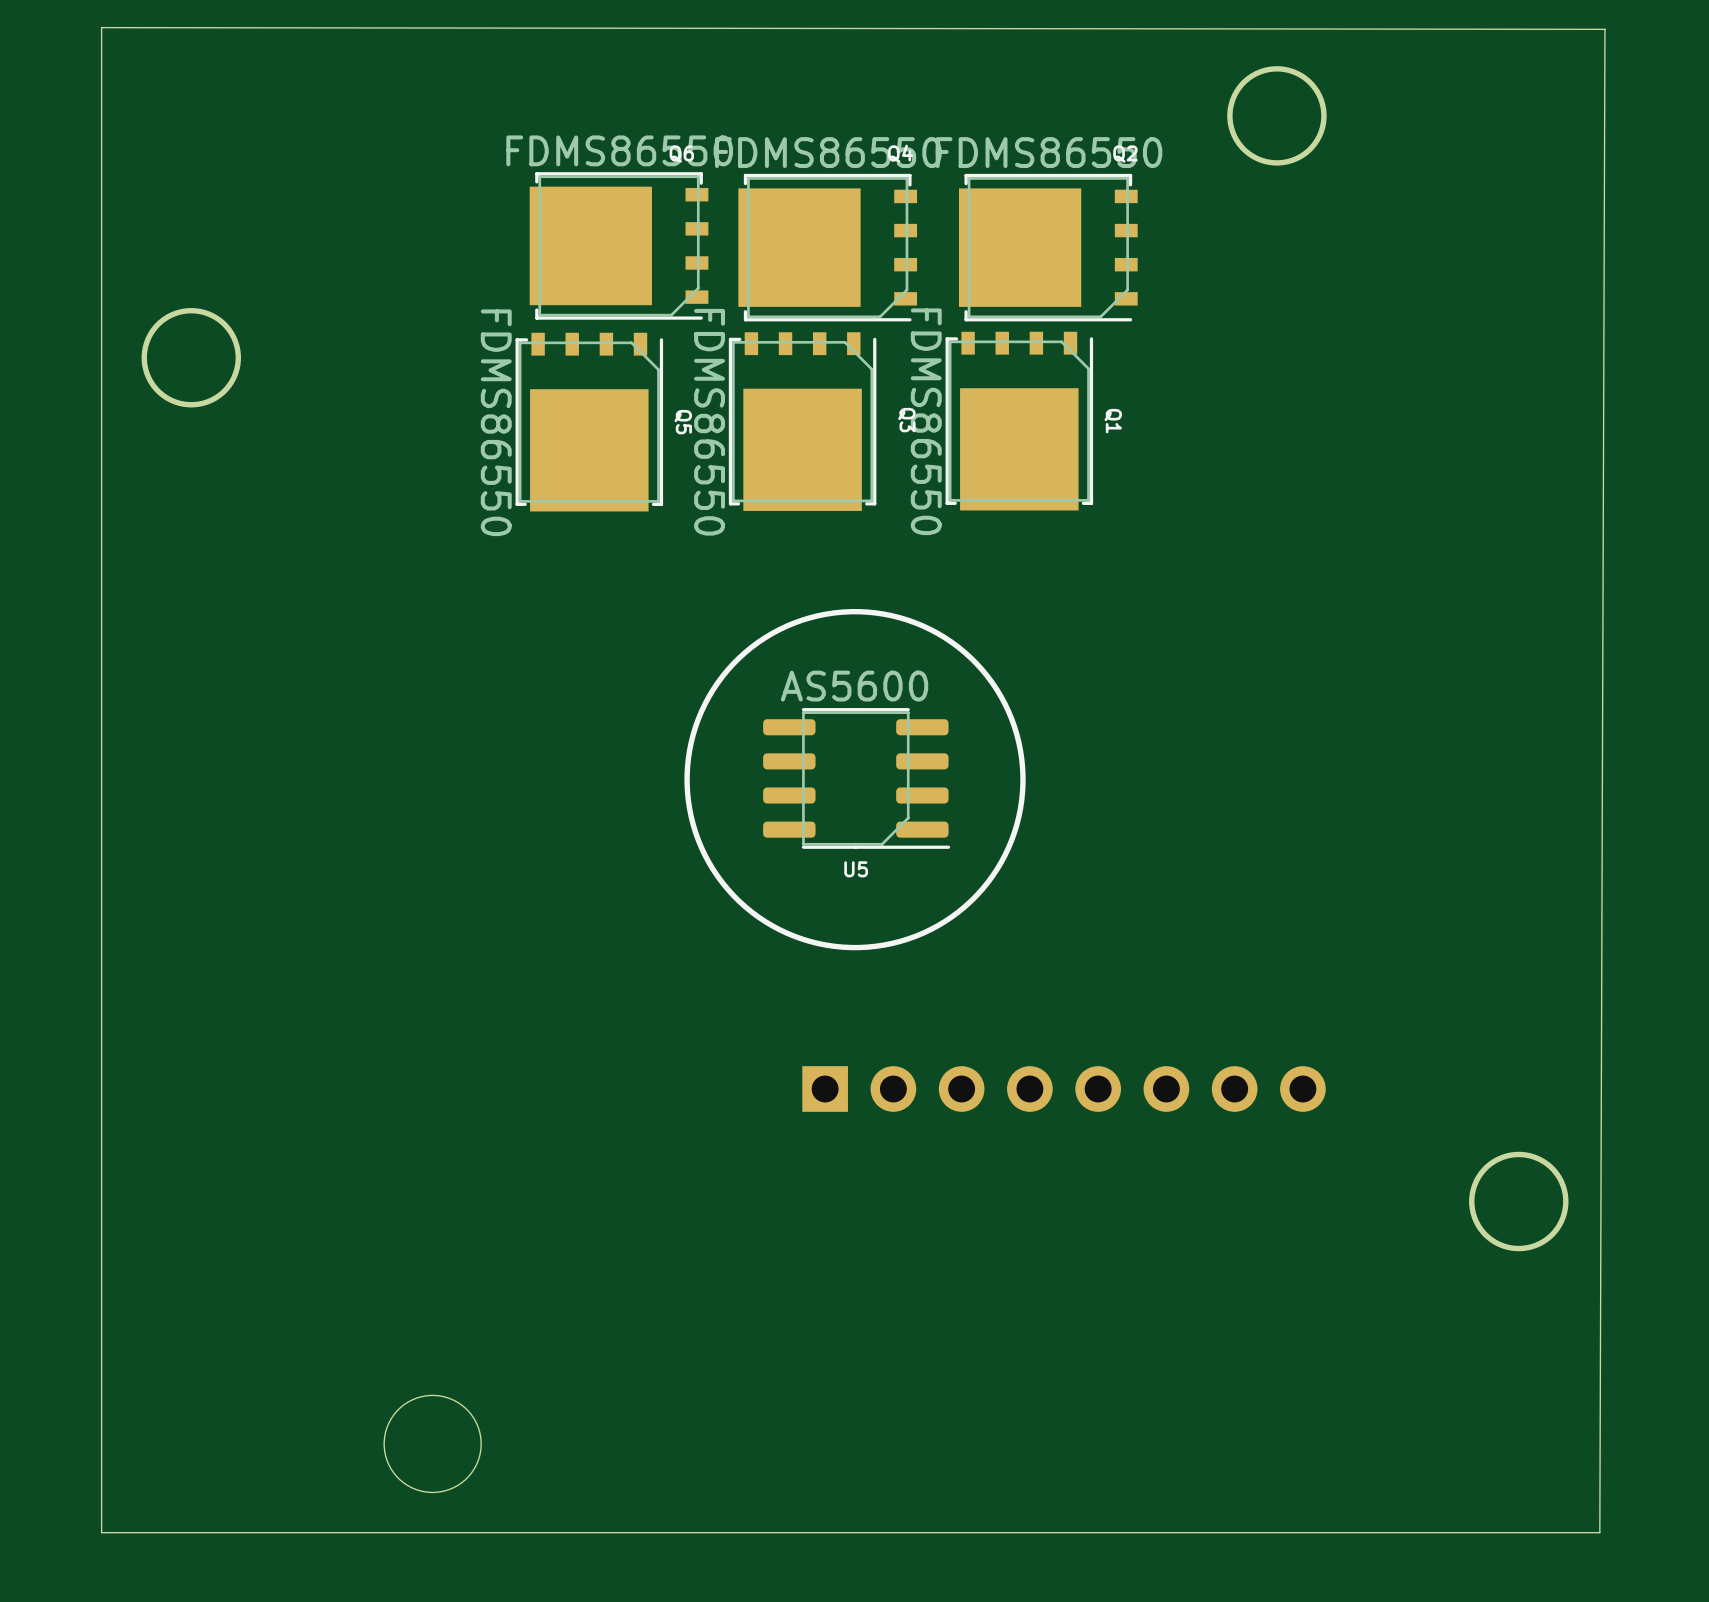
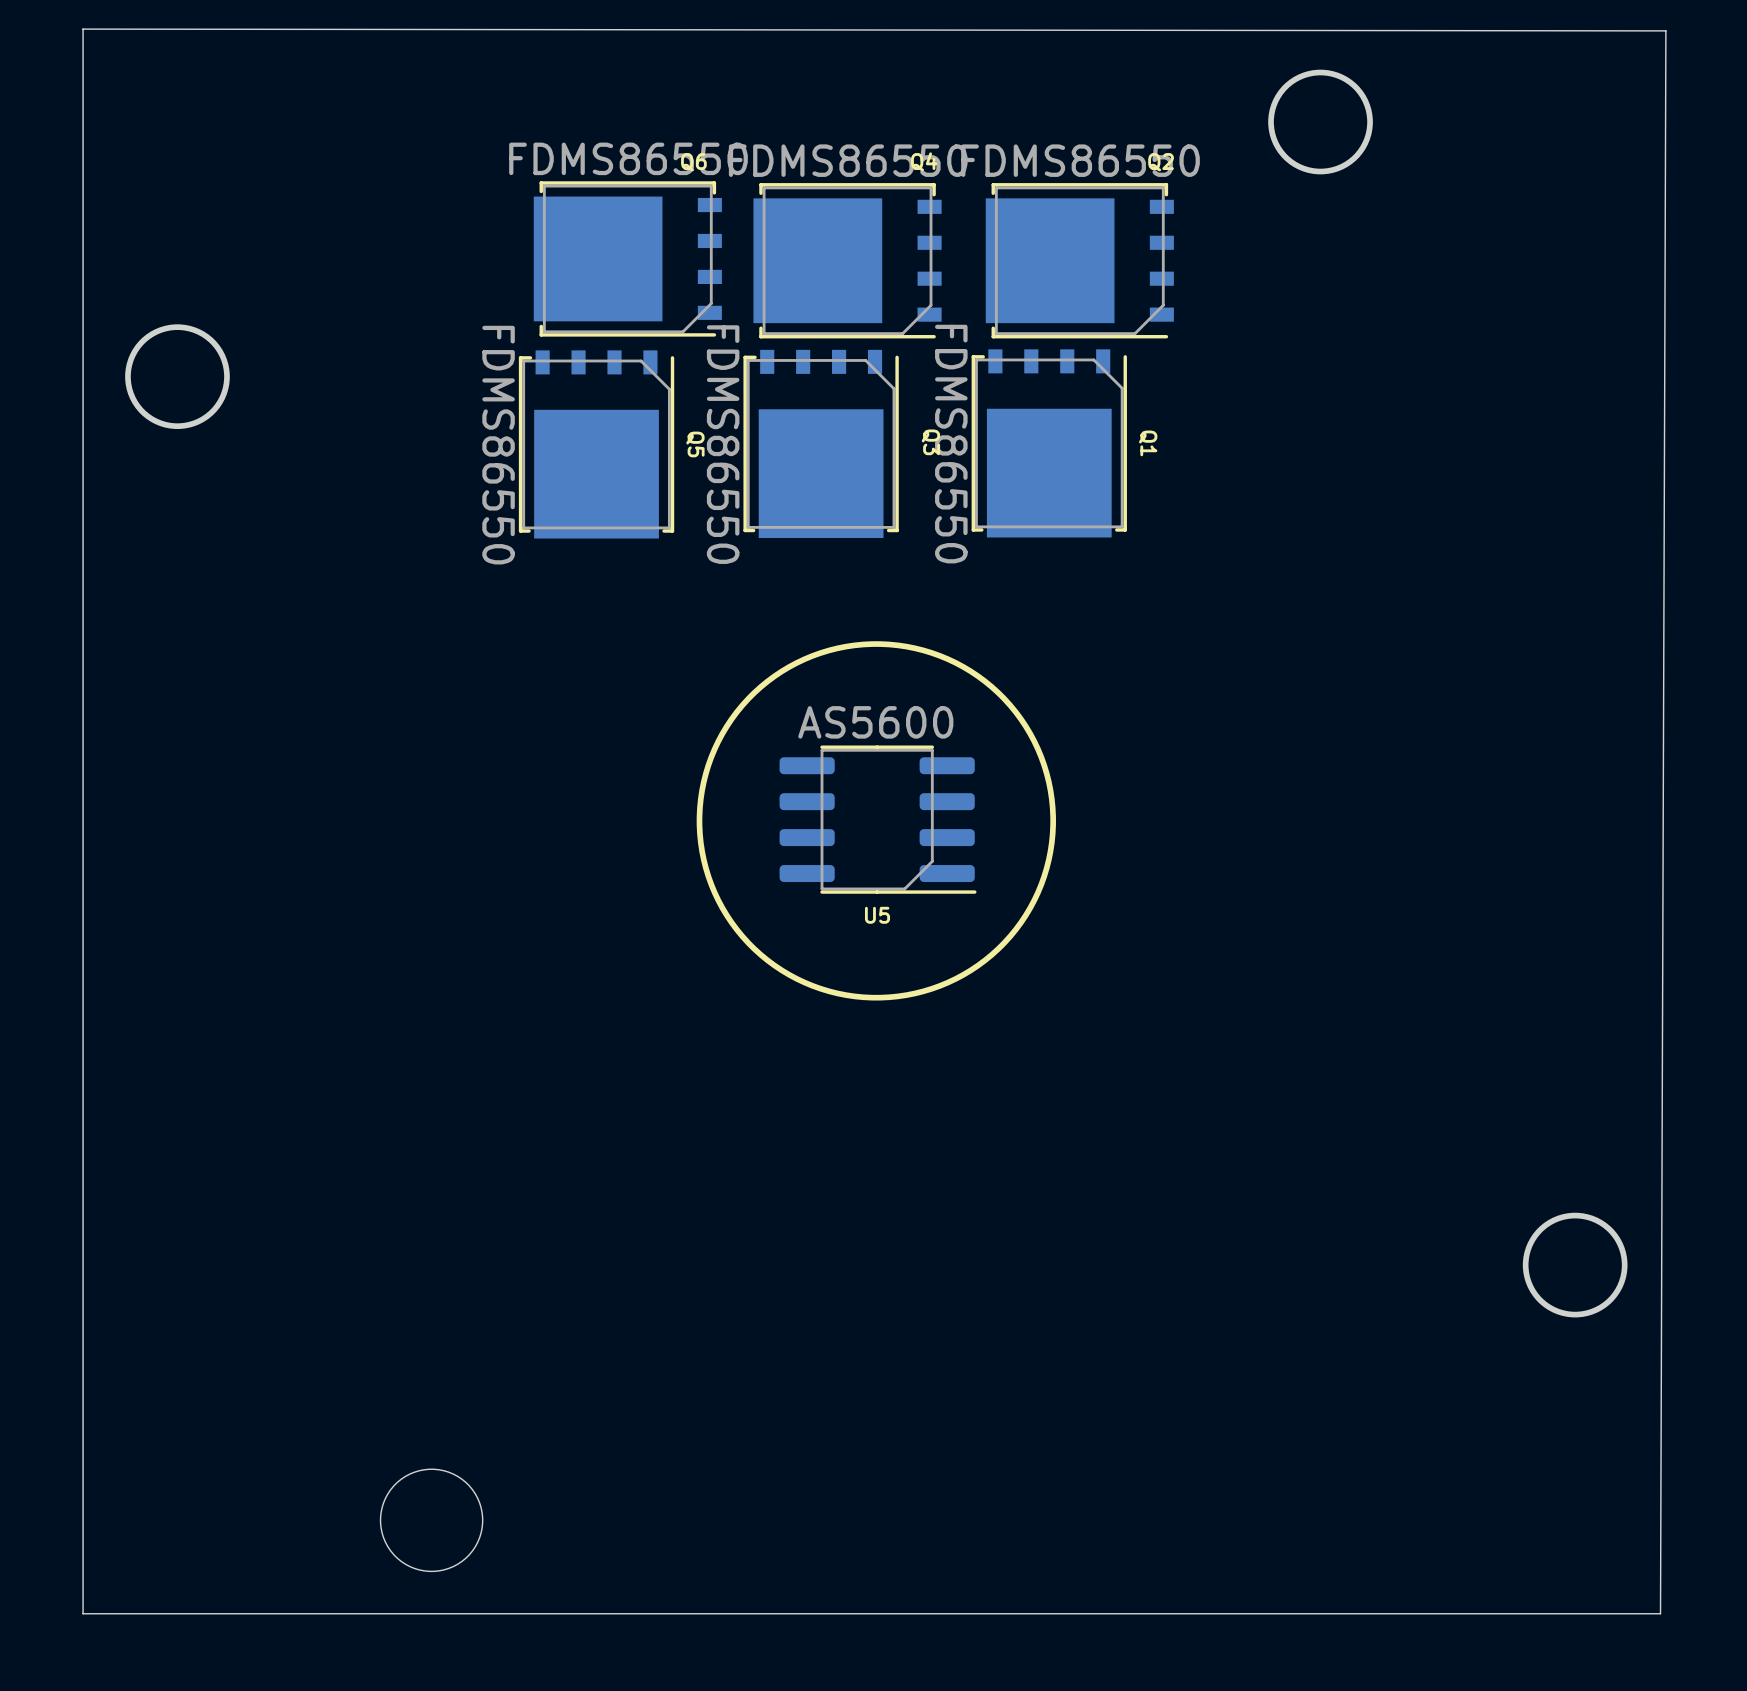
part: (1064, 1089) -> none

